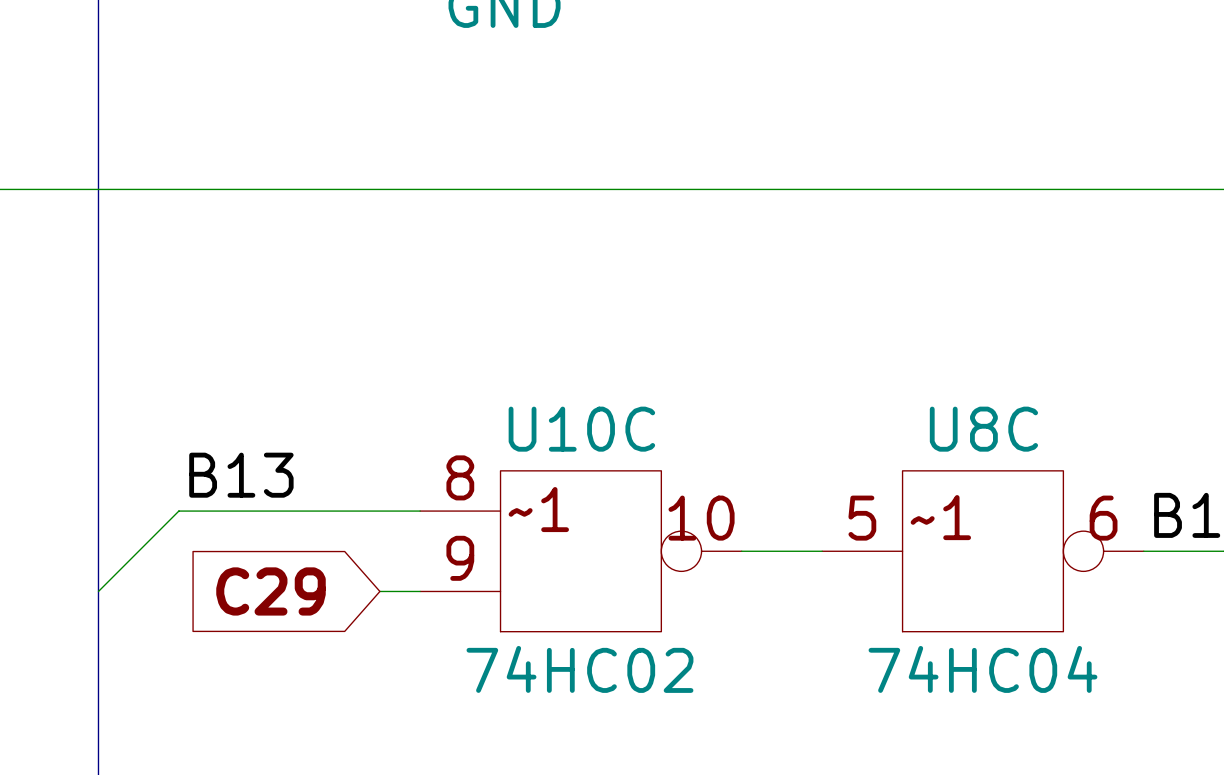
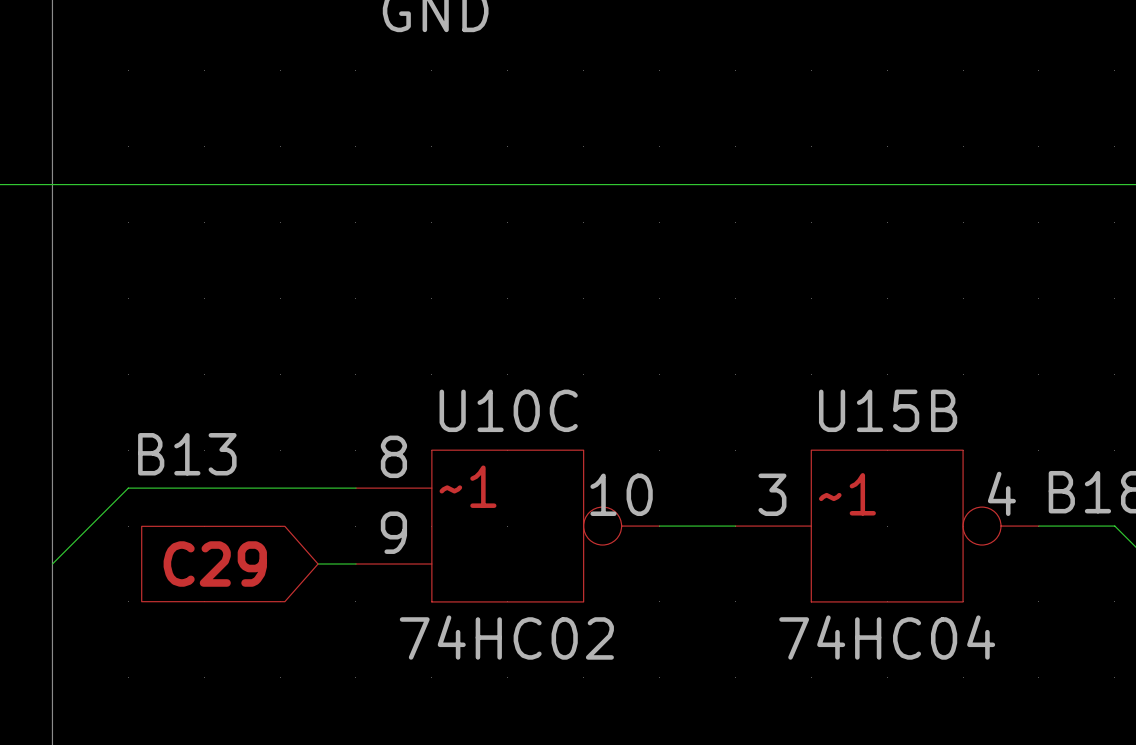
U8C name: U8C (983, 429) -> U15B (888, 410)
U8C pin number: 5 (862, 518) -> 3 (772, 494)
U8C pin number: 6 (1103, 518) -> 4 (1001, 493)

